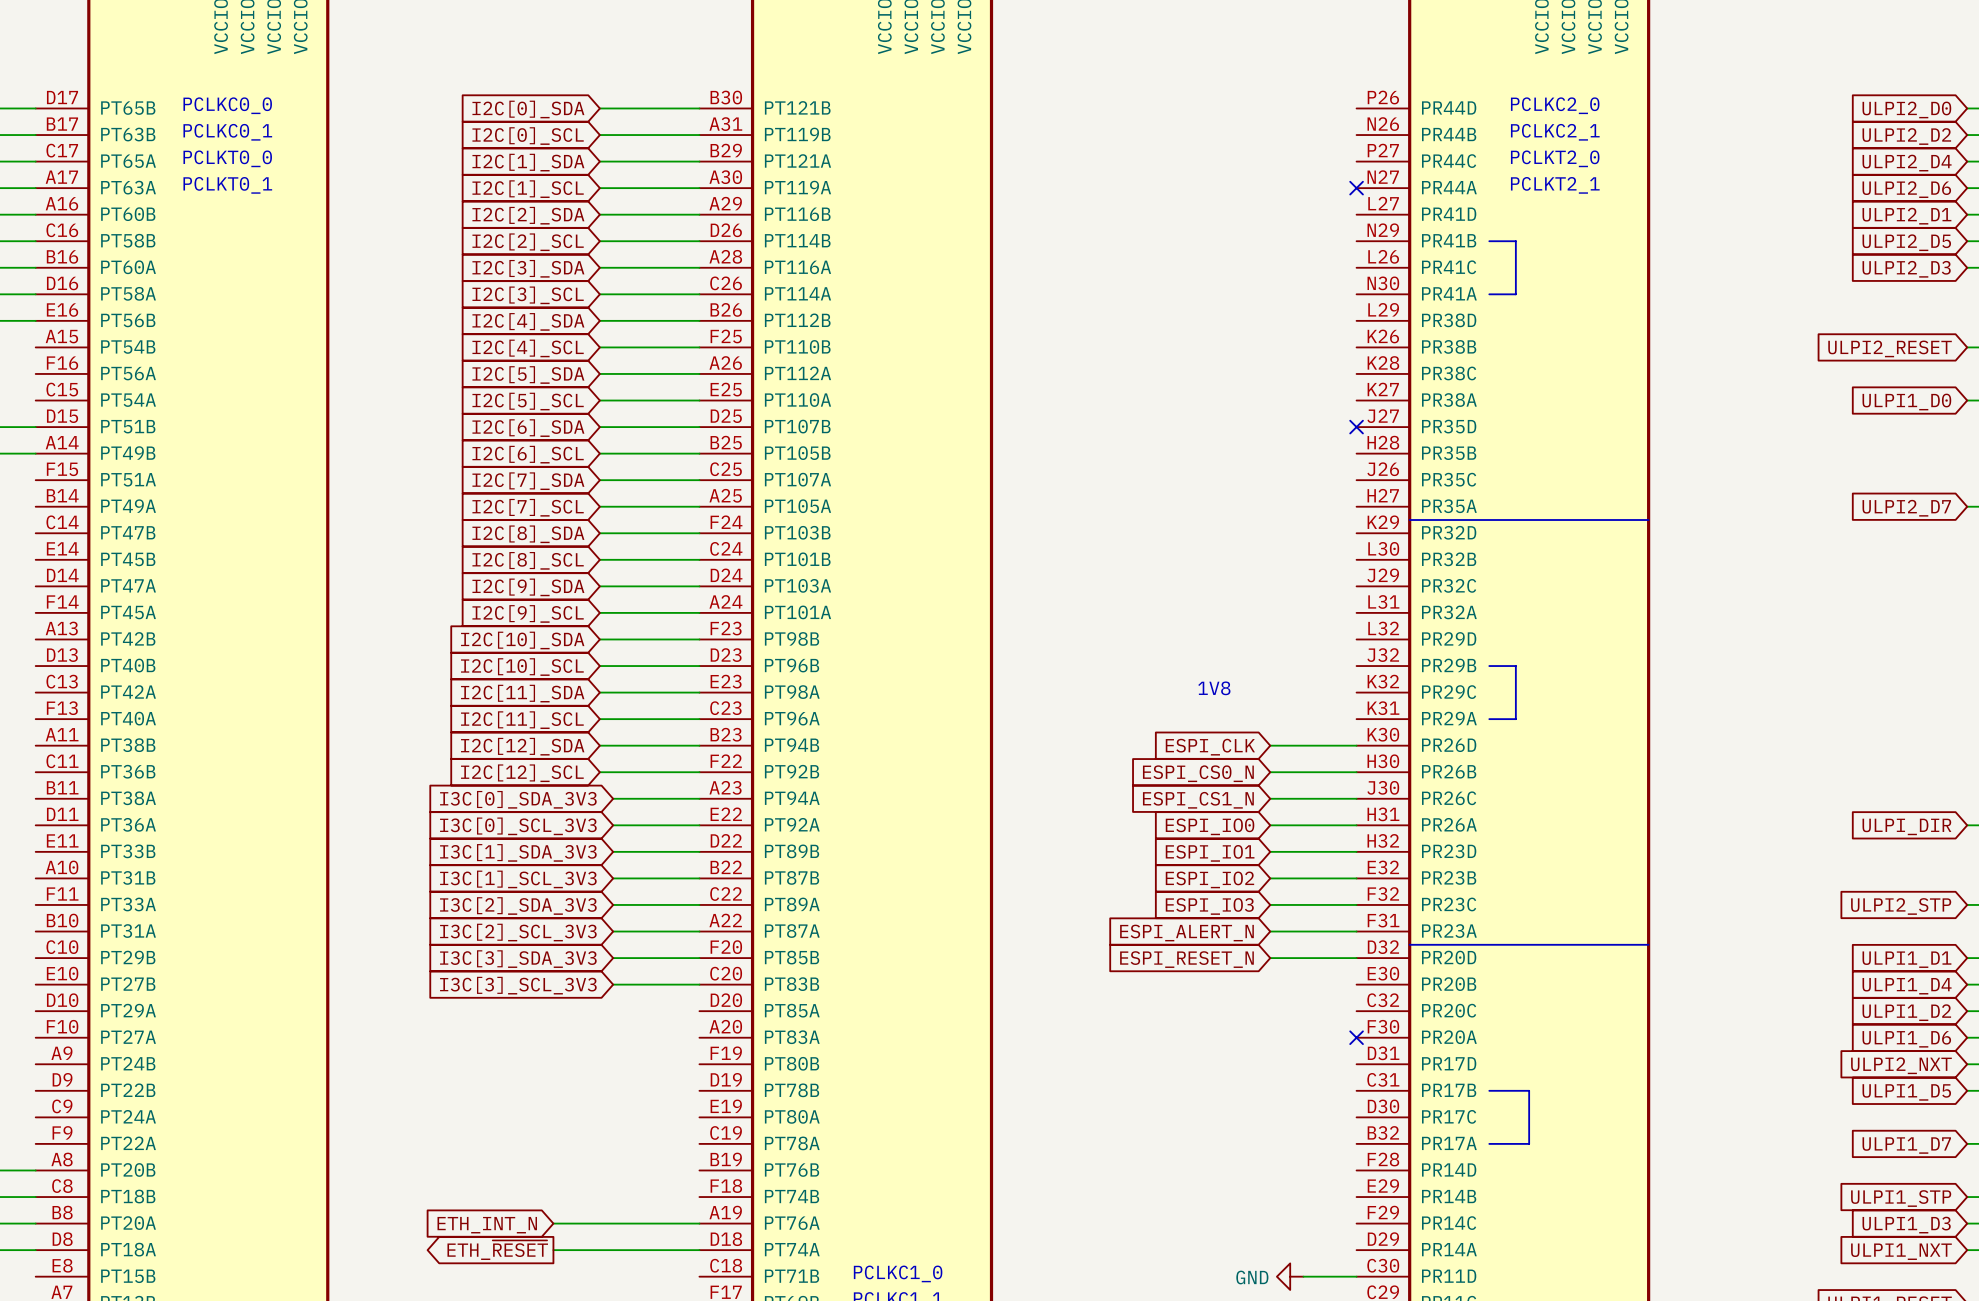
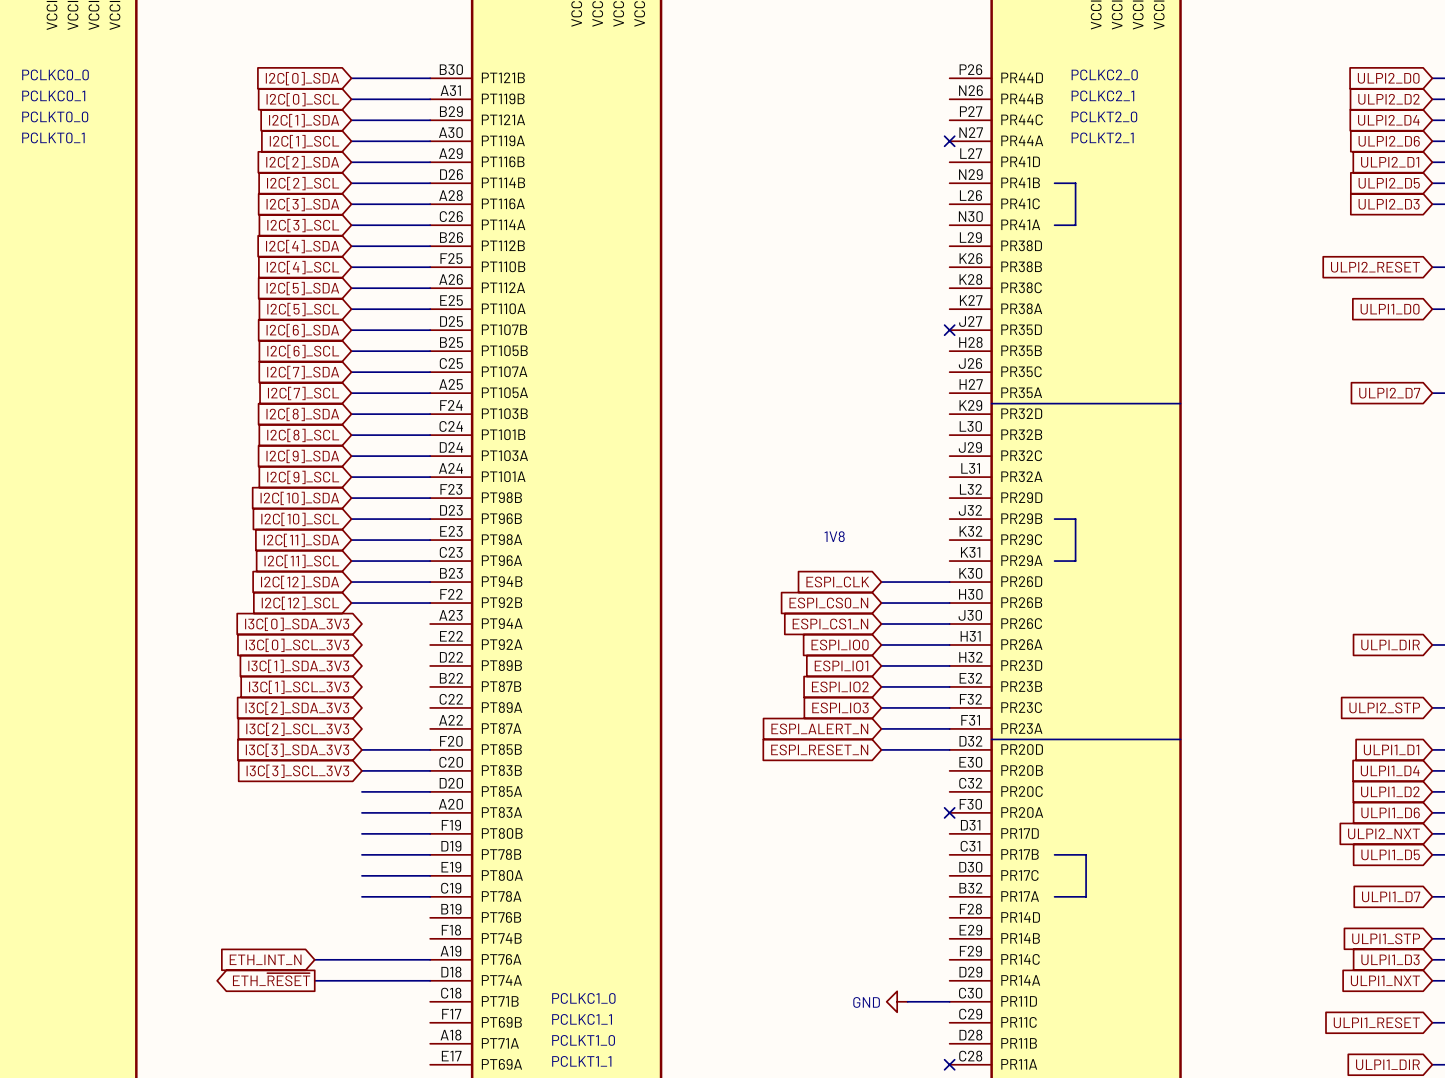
wire: (613, 798) (699, 798) -> (361, 791) (430, 791)
wire: (613, 825) (699, 825) -> (361, 812) (430, 812)
wire: (613, 851) (699, 851) -> (361, 833) (430, 833)
wire: (613, 878) (699, 878) -> (361, 854) (430, 854)
wire: (613, 904) (699, 904) -> (361, 875) (430, 875)
wire: (613, 931) (699, 931) -> (361, 896) (430, 896)

